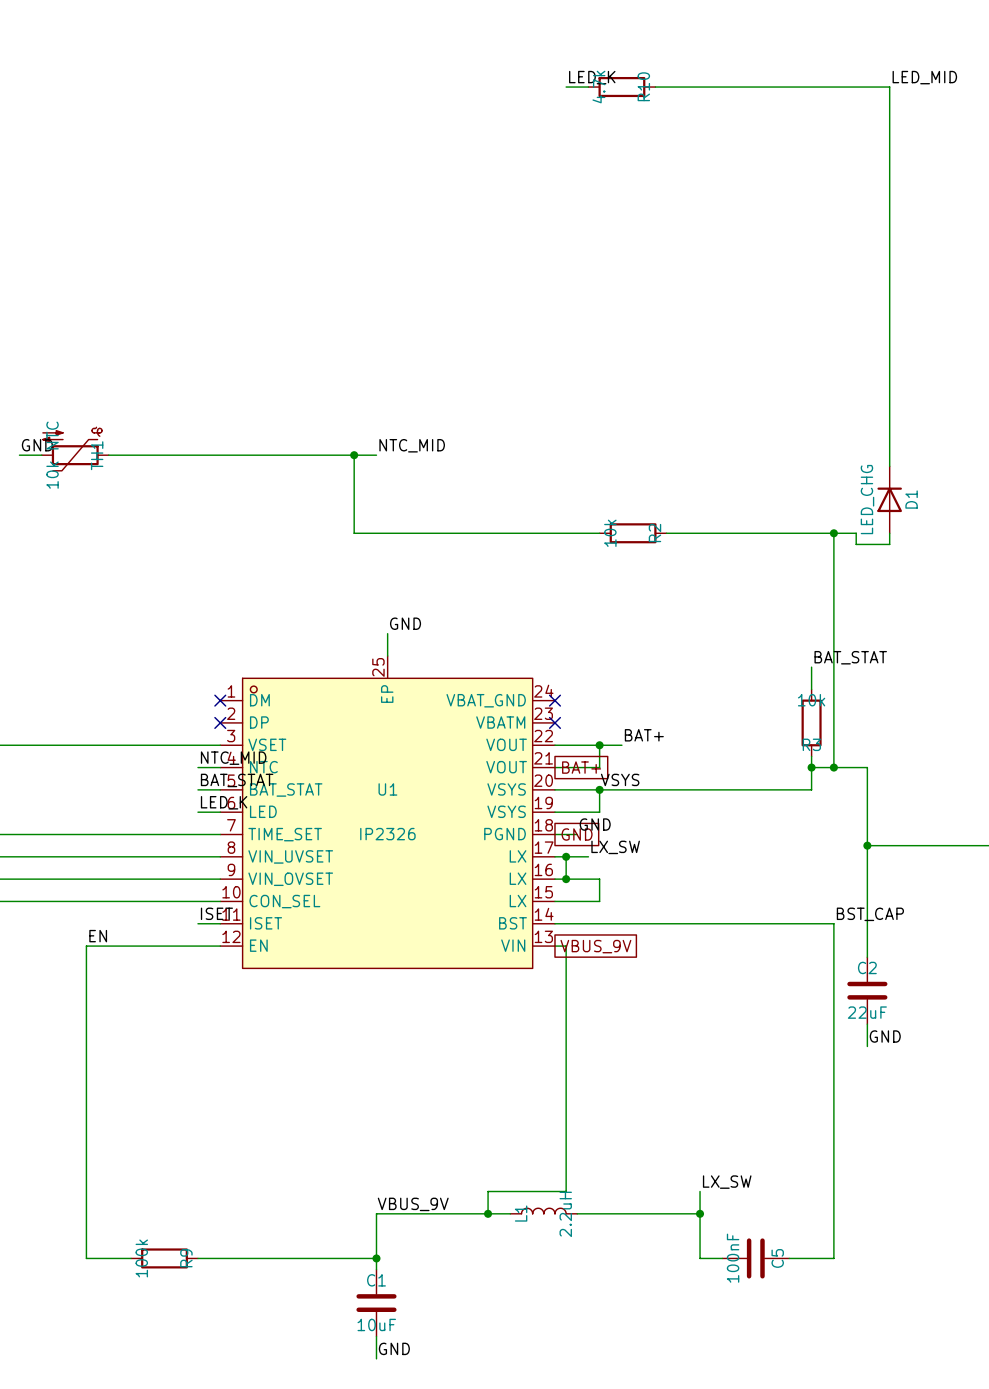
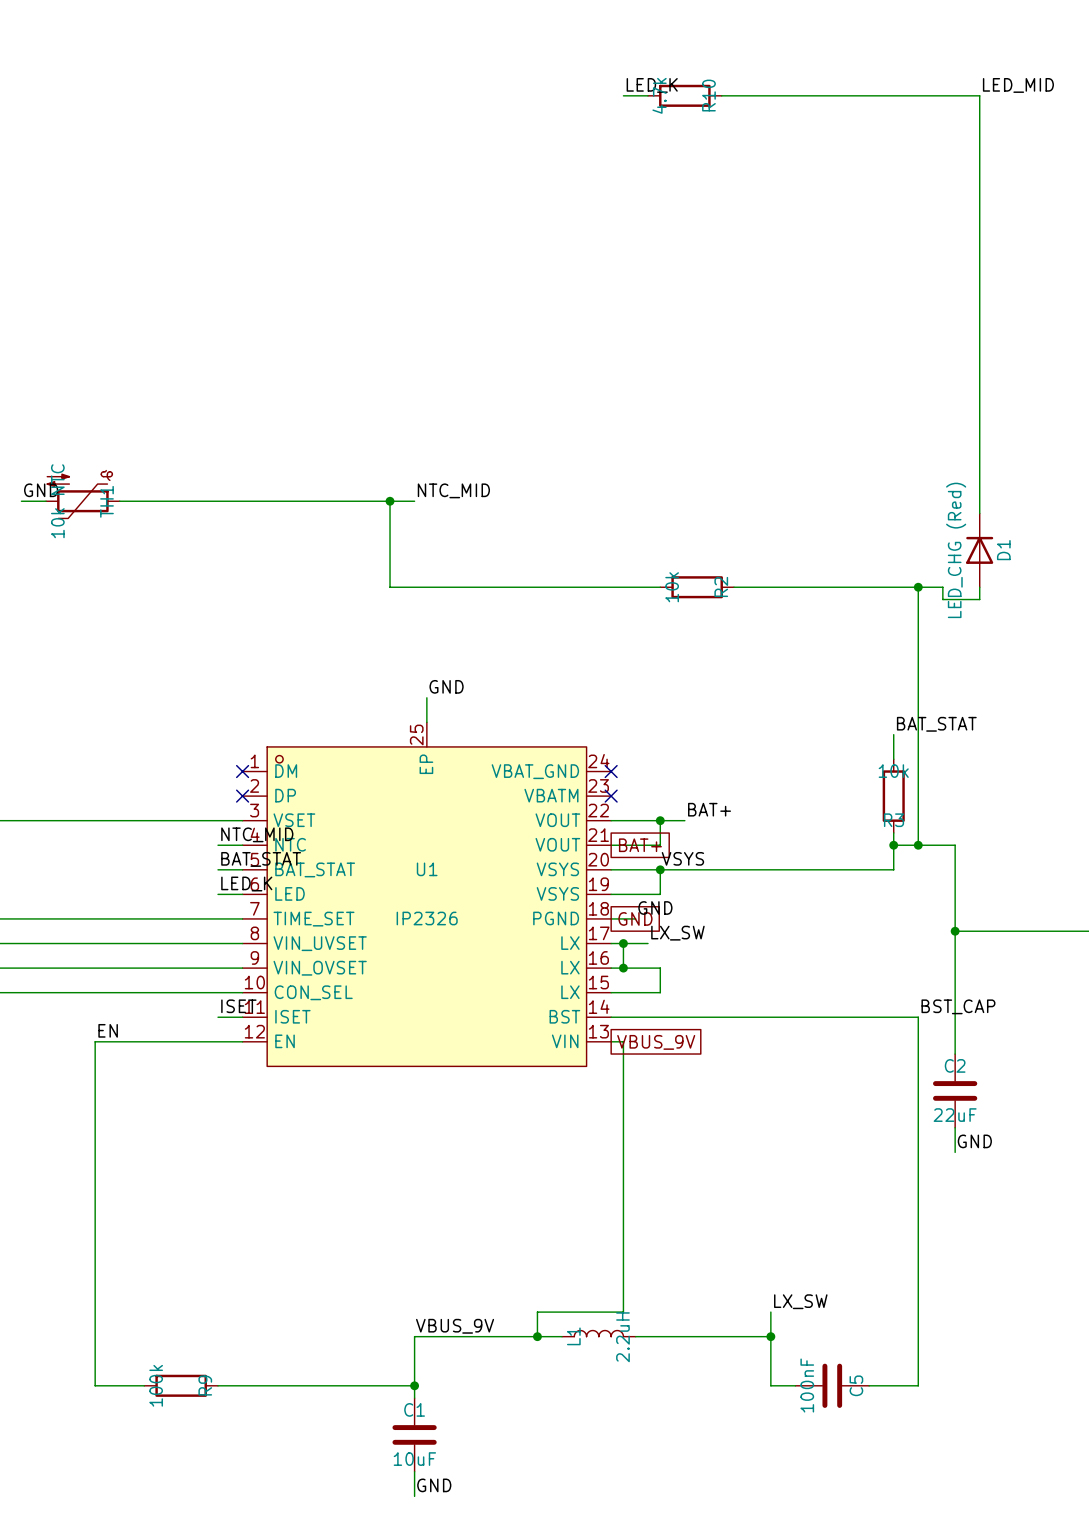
D1 value: LED_CHG (867, 499) -> LED_CHG (Red) (956, 550)

